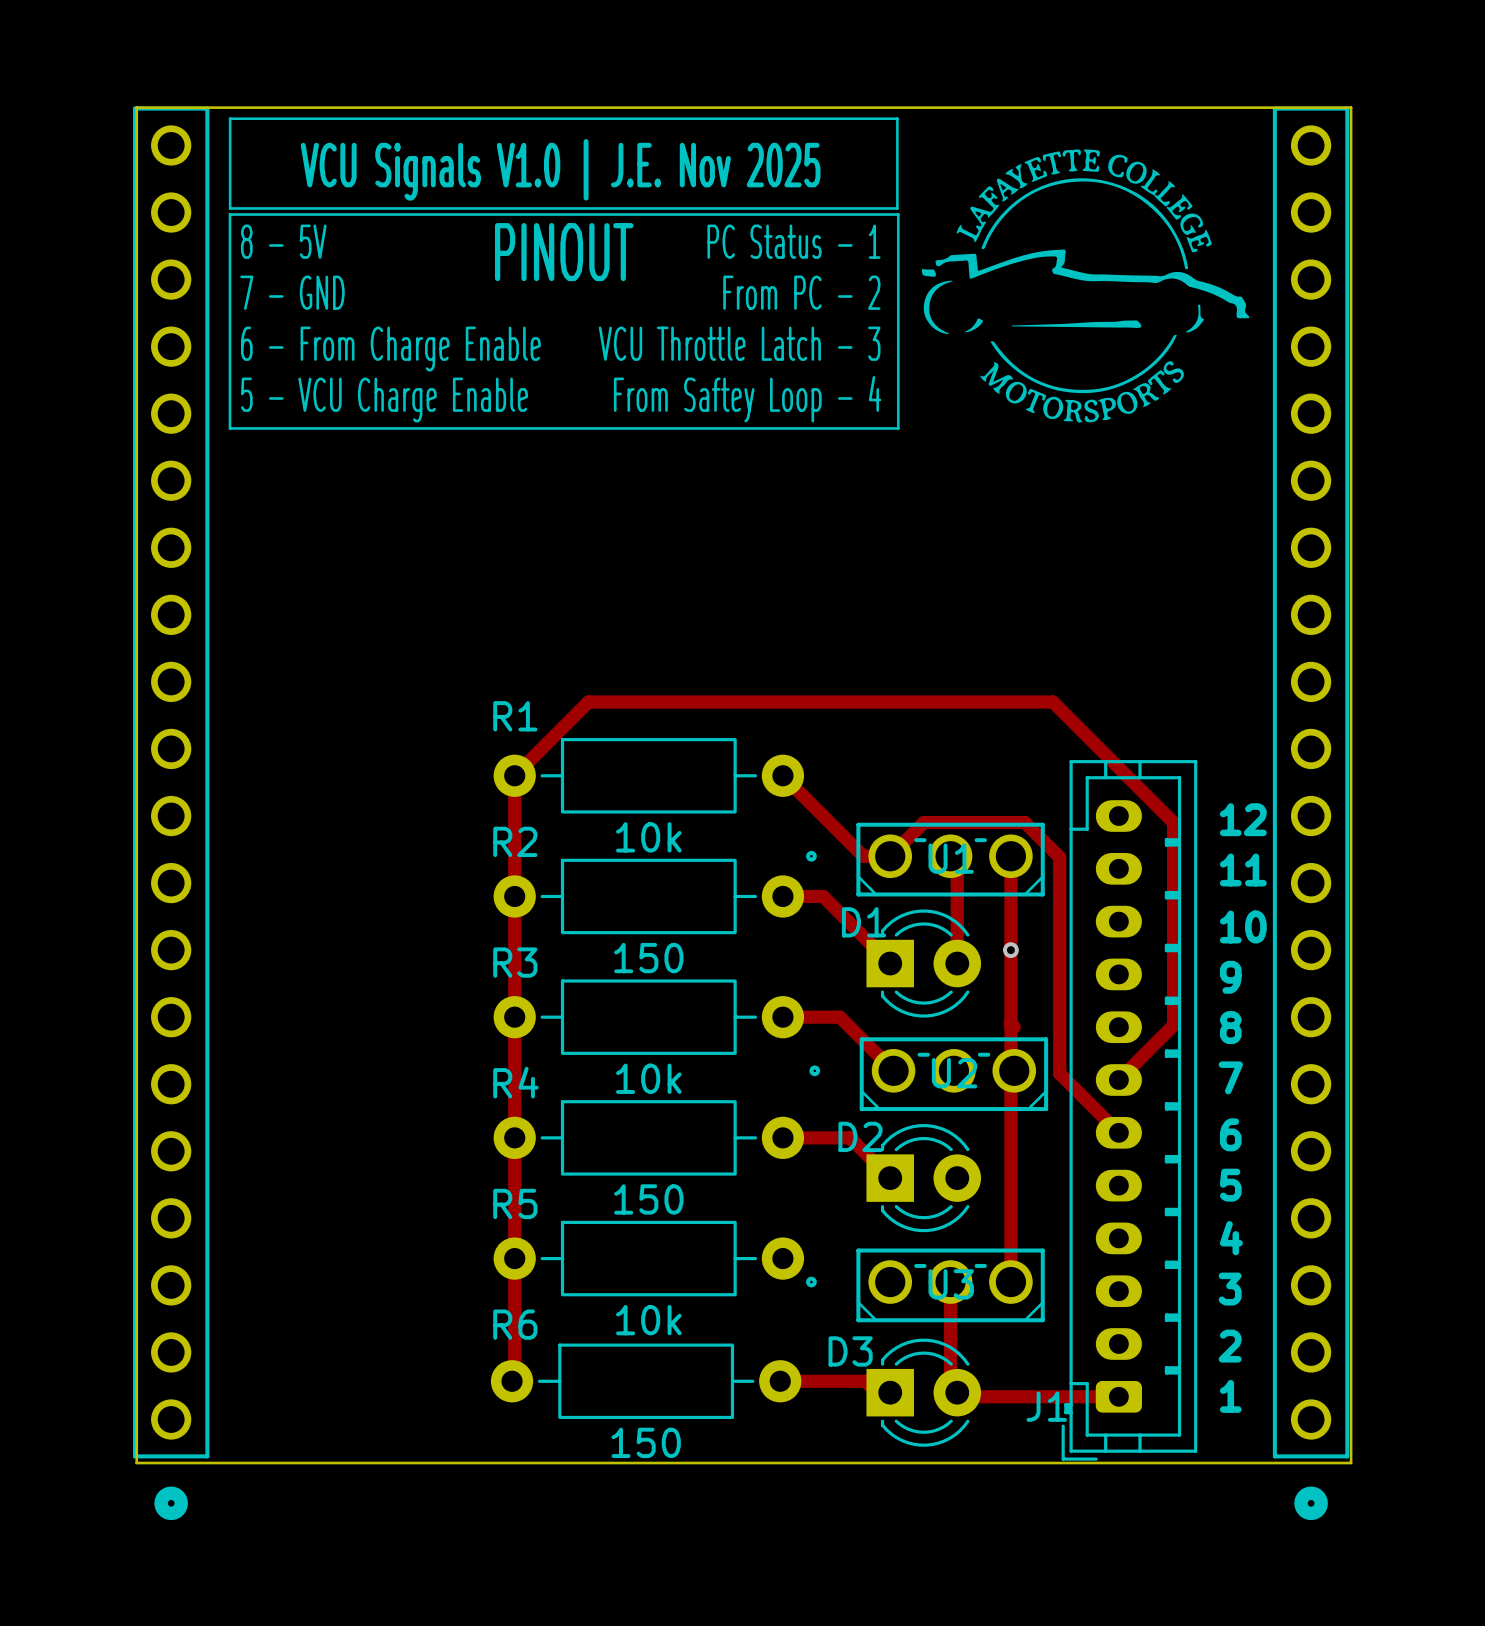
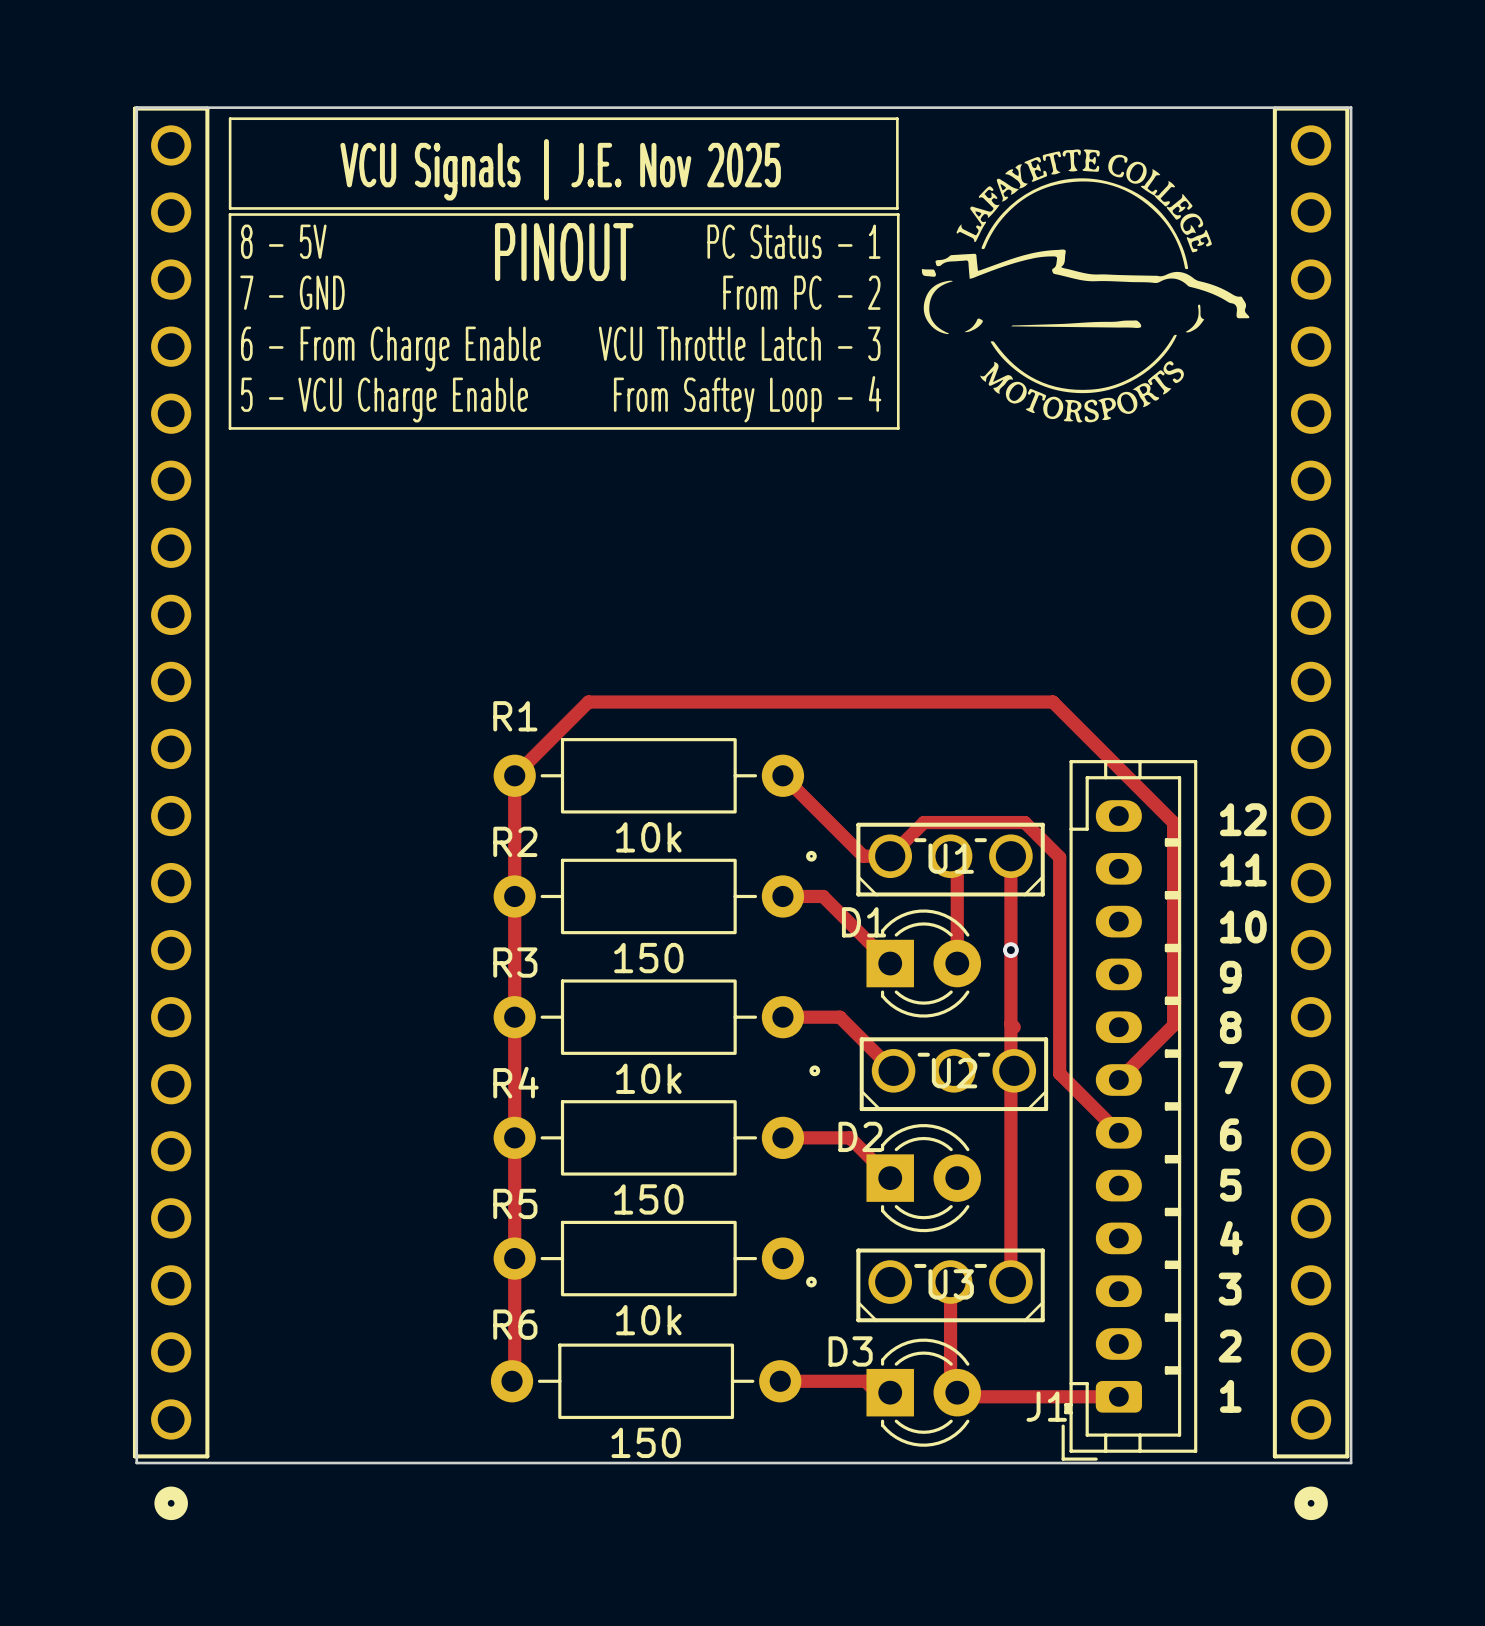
text: VCU Signals V1.0 | J.E. Nov 2025 (560, 169) -> VCU Signals | J.E. Nov 2025 (560, 169)

